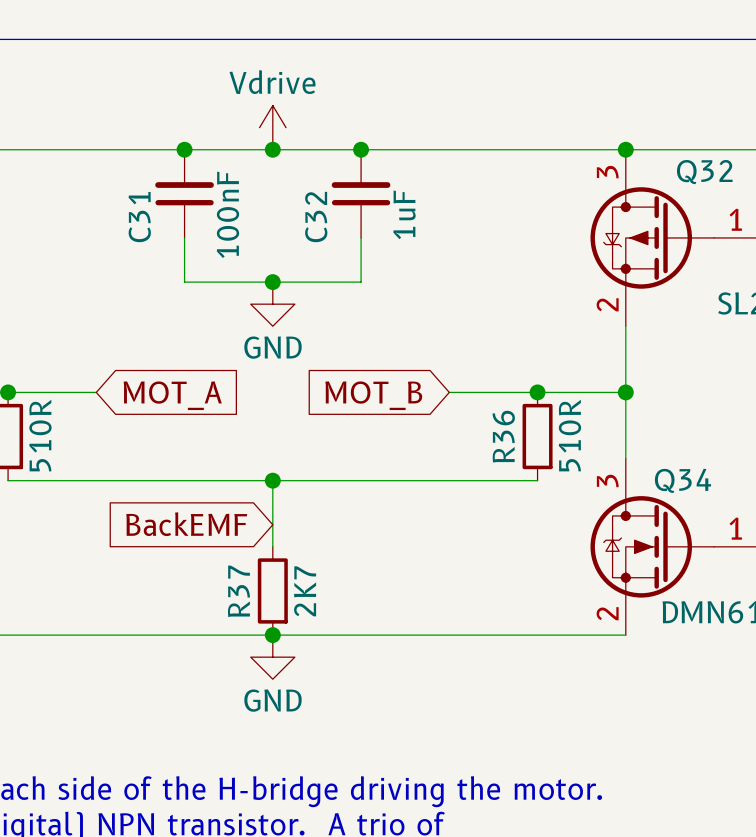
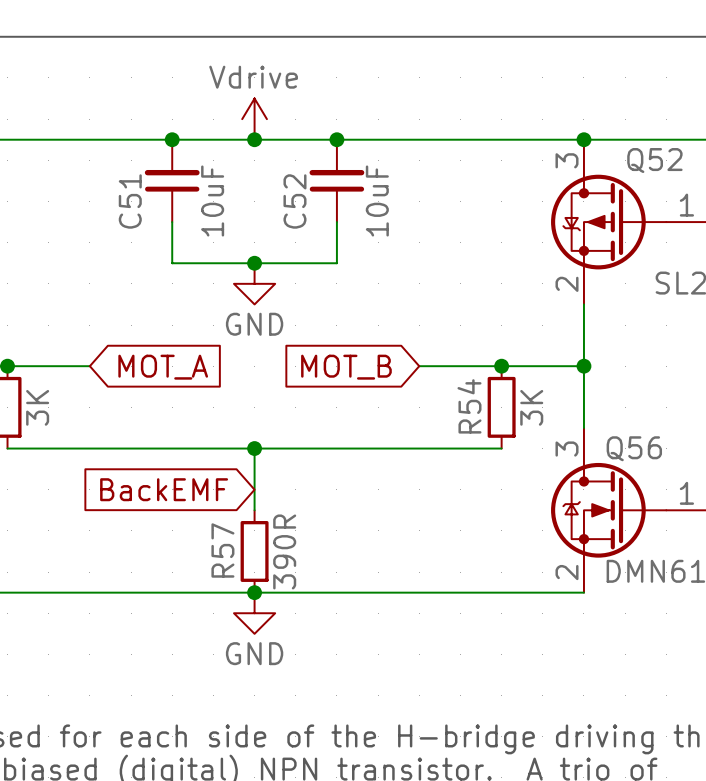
Q32 name: Q32 (704, 172) -> Q52 (654, 160)
C31 value: 100nF (227, 214) -> 10uF (212, 200)
C32 value: 1uF (404, 214) -> 10uF (377, 200)
C31 name: C31 (139, 217) -> C51 (130, 201)
C32 name: C32 (316, 217) -> C52 (294, 201)
part value: 510R (40, 435) -> 3K (37, 407)
R36 value: 510R (569, 435) -> 3K (531, 407)
R36 name: R36 (503, 436) -> R54 (469, 406)
Q34 name: Q34 (683, 480) -> Q56 (634, 448)
R37 name: R37 (238, 591) -> R57 (222, 550)
R37 value: 2K7 (305, 591) -> 390R (284, 551)

